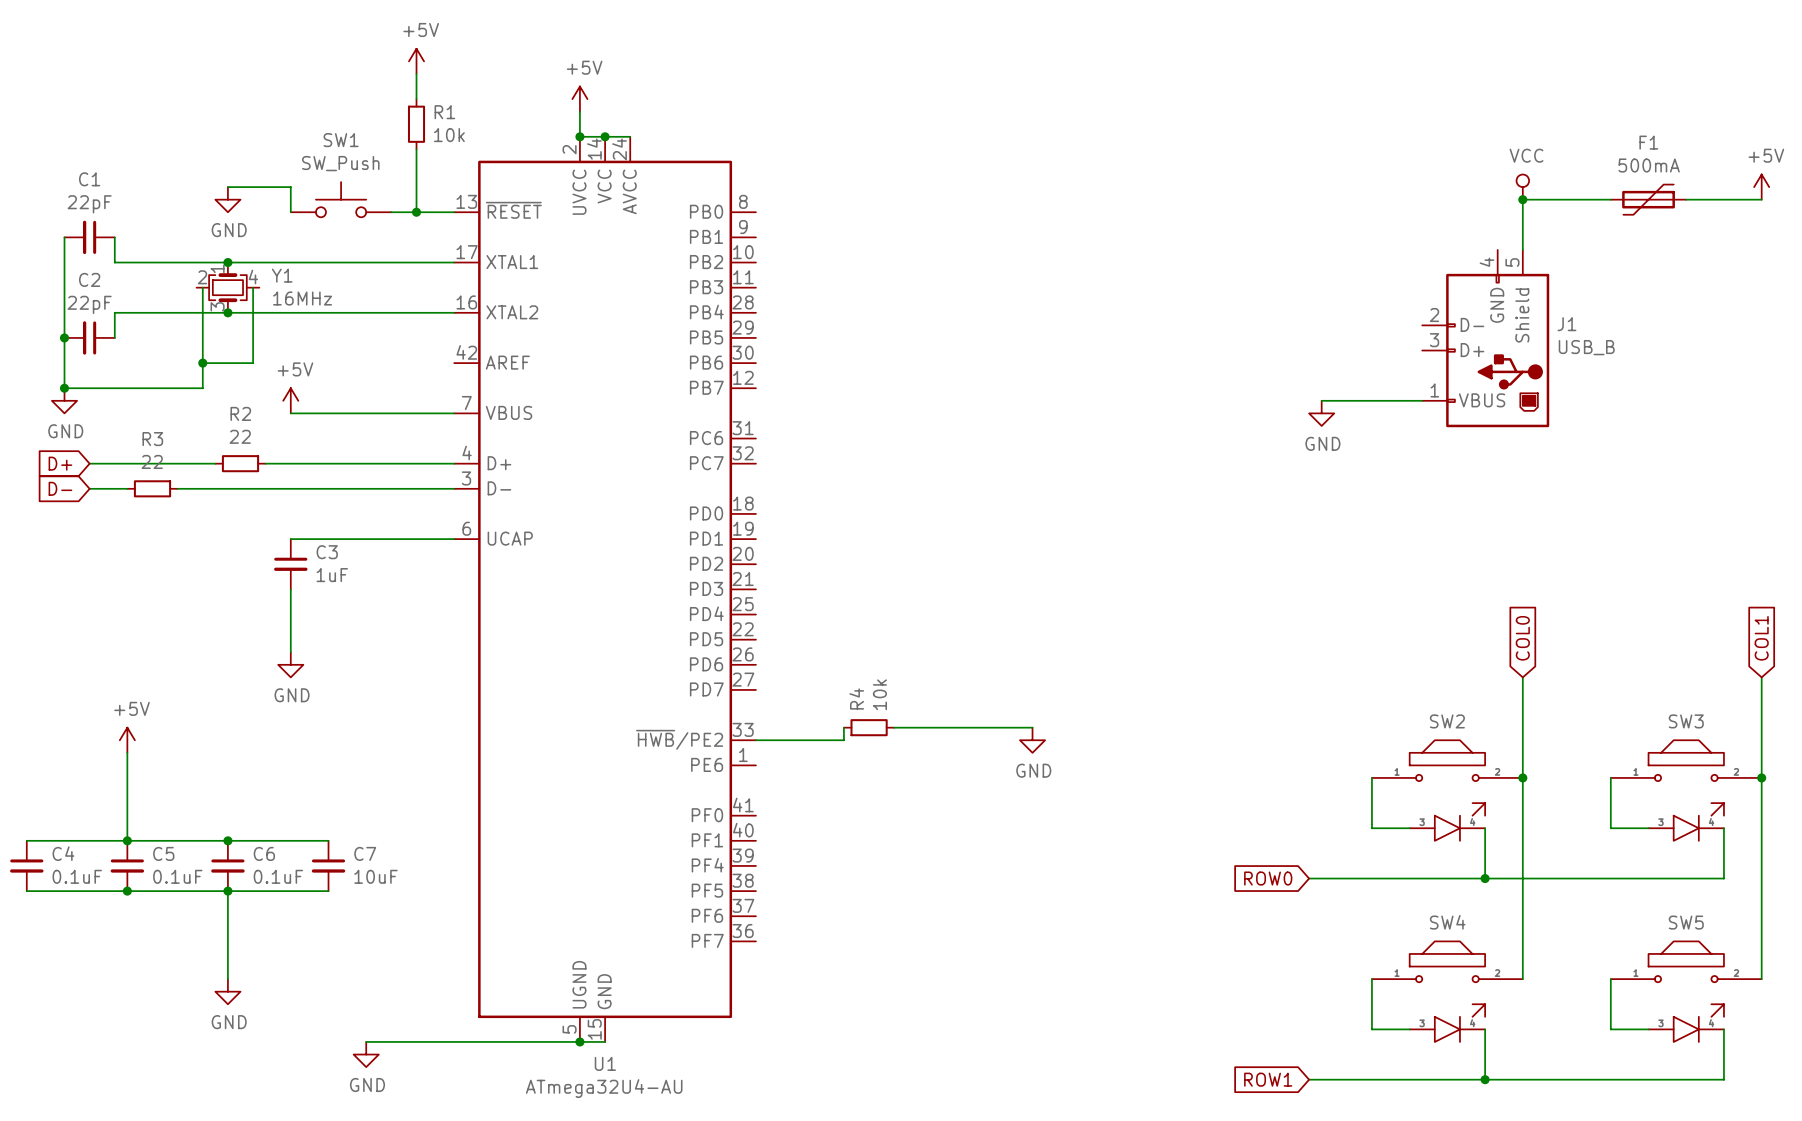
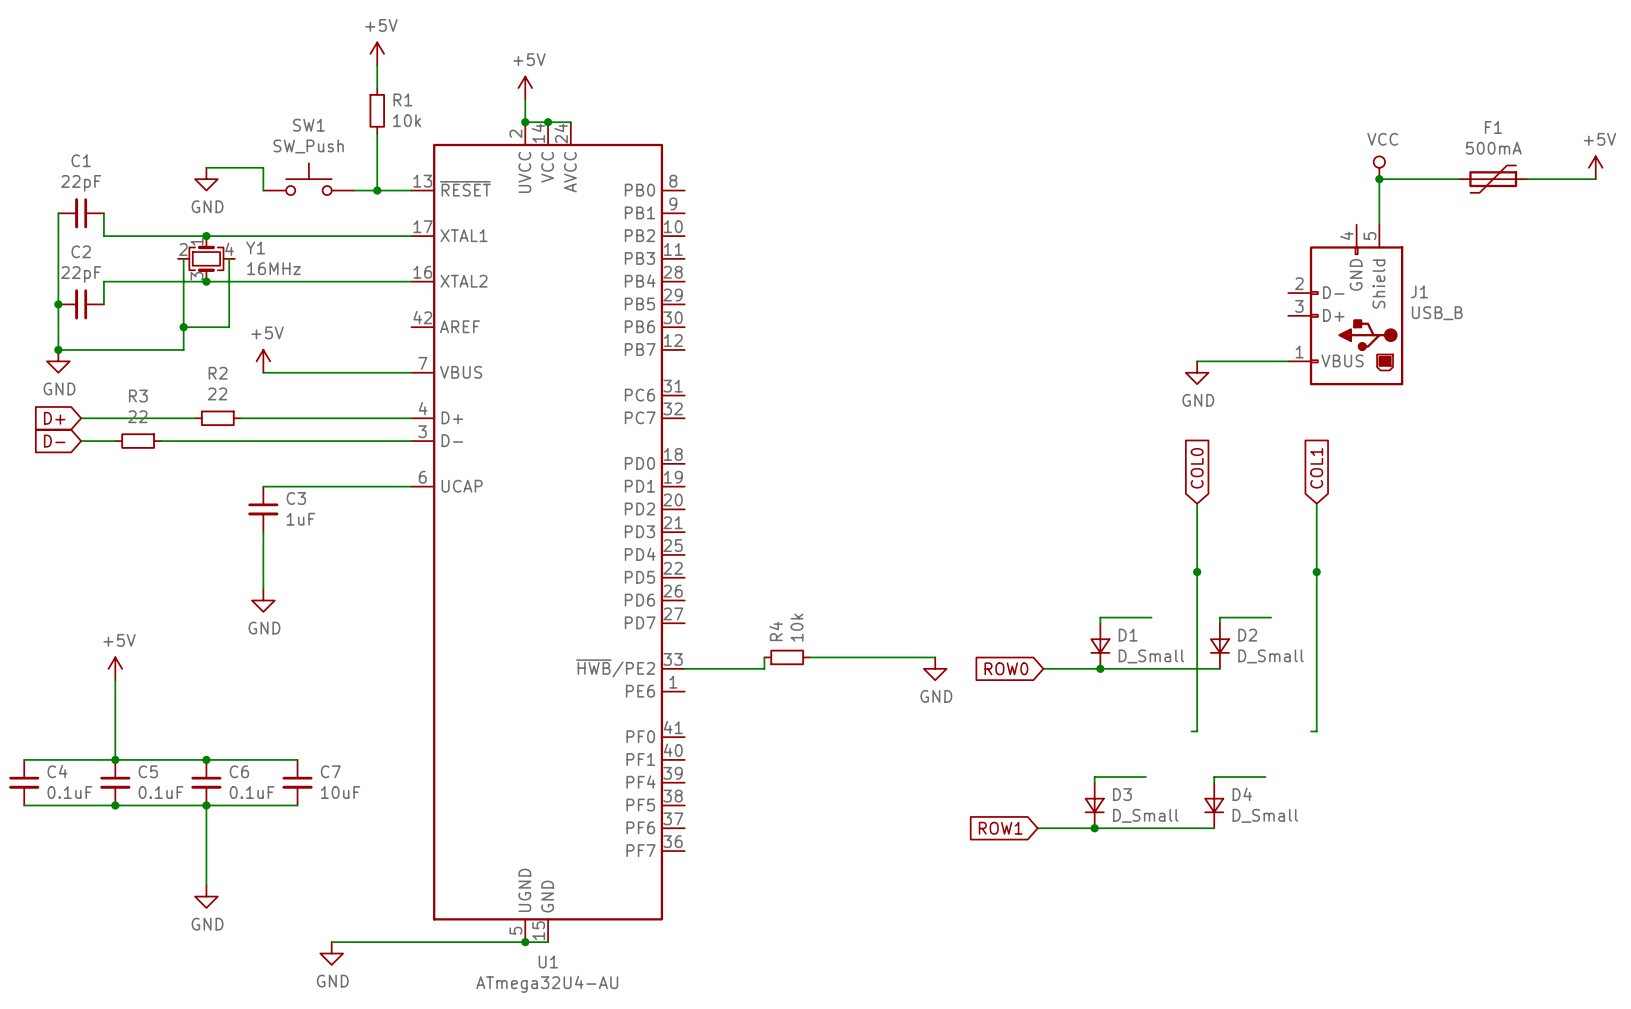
global label: none -> COL1 (1316, 468)
wire: none -> (1197, 503) (1197, 731) (1191, 731)
wire: none -> (1316, 503) (1316, 731) (1311, 731)
junction: none -> (1197, 572)
junction: none -> (1316, 572)
global label position: COL0 (1522, 638) -> COL0 (1197, 468)
global label: COL1 (1761, 638) -> none
wire: (1522, 677) (1522, 979) -> none
wire: (1761, 677) (1761, 979) -> none
wire: none -> (1151, 617) (1100, 617) (1100, 623)
wire: none -> (1271, 617) (1219, 617) (1219, 623)
D1: none -> D_Small (1100, 646)
D2: none -> D_Small (1219, 646)
wire: none -> (1043, 668) (1219, 668)
junction: none -> (1100, 668)
wire: (1371, 777) (1371, 828) (1409, 828) -> none
junction: (1522, 777) -> none
wire: (1610, 777) (1610, 828) (1648, 828) -> none
junction: (1761, 777) -> none
SW2: (1447, 790) -> none
SW3: (1686, 790) -> none
wire: (1485, 828) (1485, 878) -> none
wire: (1723, 828) (1723, 878) (1309, 878) -> none
wire: none -> (1145, 777) (1094, 777) (1094, 782)
wire: none -> (1265, 777) (1214, 777) (1214, 782)
global label position: ROW0 (1268, 878) -> ROW0 (1006, 668)
junction: (1485, 878) -> none
D3: none -> D_Small (1094, 805)
D4: none -> D_Small (1214, 805)
wire: none -> (1037, 828) (1214, 828)
junction: none -> (1094, 828)
wire: (1371, 979) (1371, 1029) (1409, 1029) -> none
wire: (1610, 979) (1610, 1029) (1648, 1029) -> none
SW4: (1447, 991) -> none
SW5: (1686, 991) -> none
wire: (1485, 1029) (1485, 1079) -> none
wire: (1723, 1029) (1723, 1079) (1309, 1079) -> none
global label position: ROW1 (1268, 1079) -> ROW1 (1000, 828)
junction: (1485, 1079) -> none

